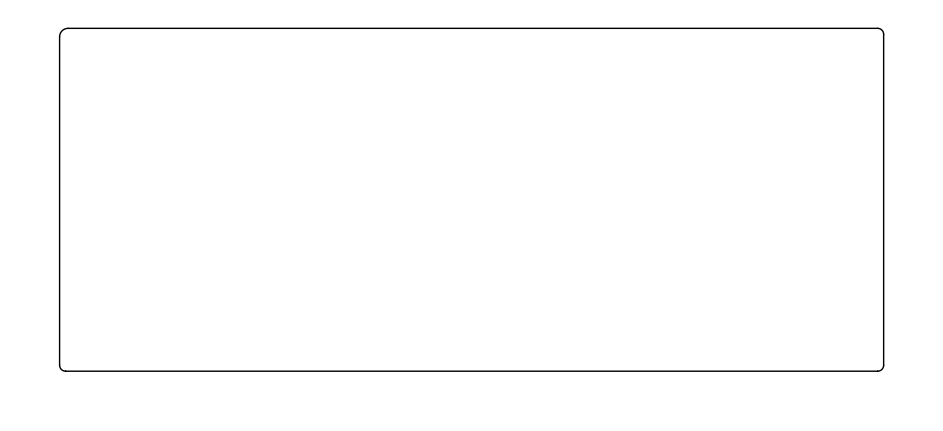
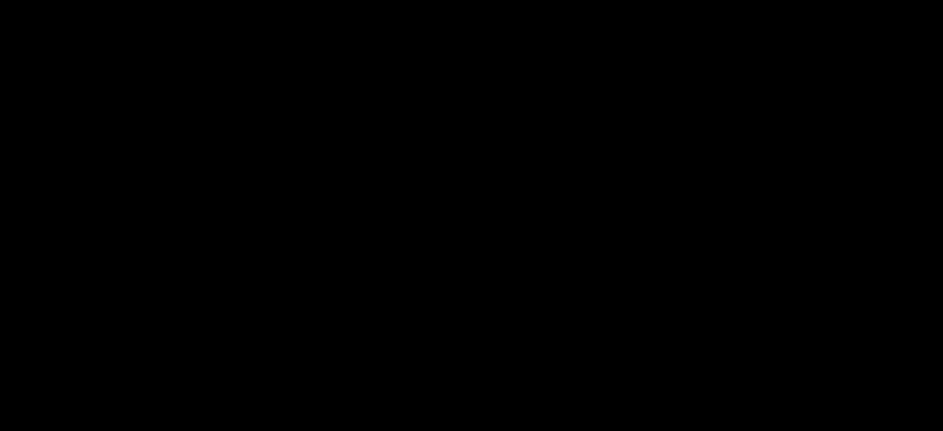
board edge: (68, 28) (879, 28) (883, 34) (883, 367) (877, 371) (63, 370) (59, 365) (59, 36) (62, 30) (68, 28) -> none

